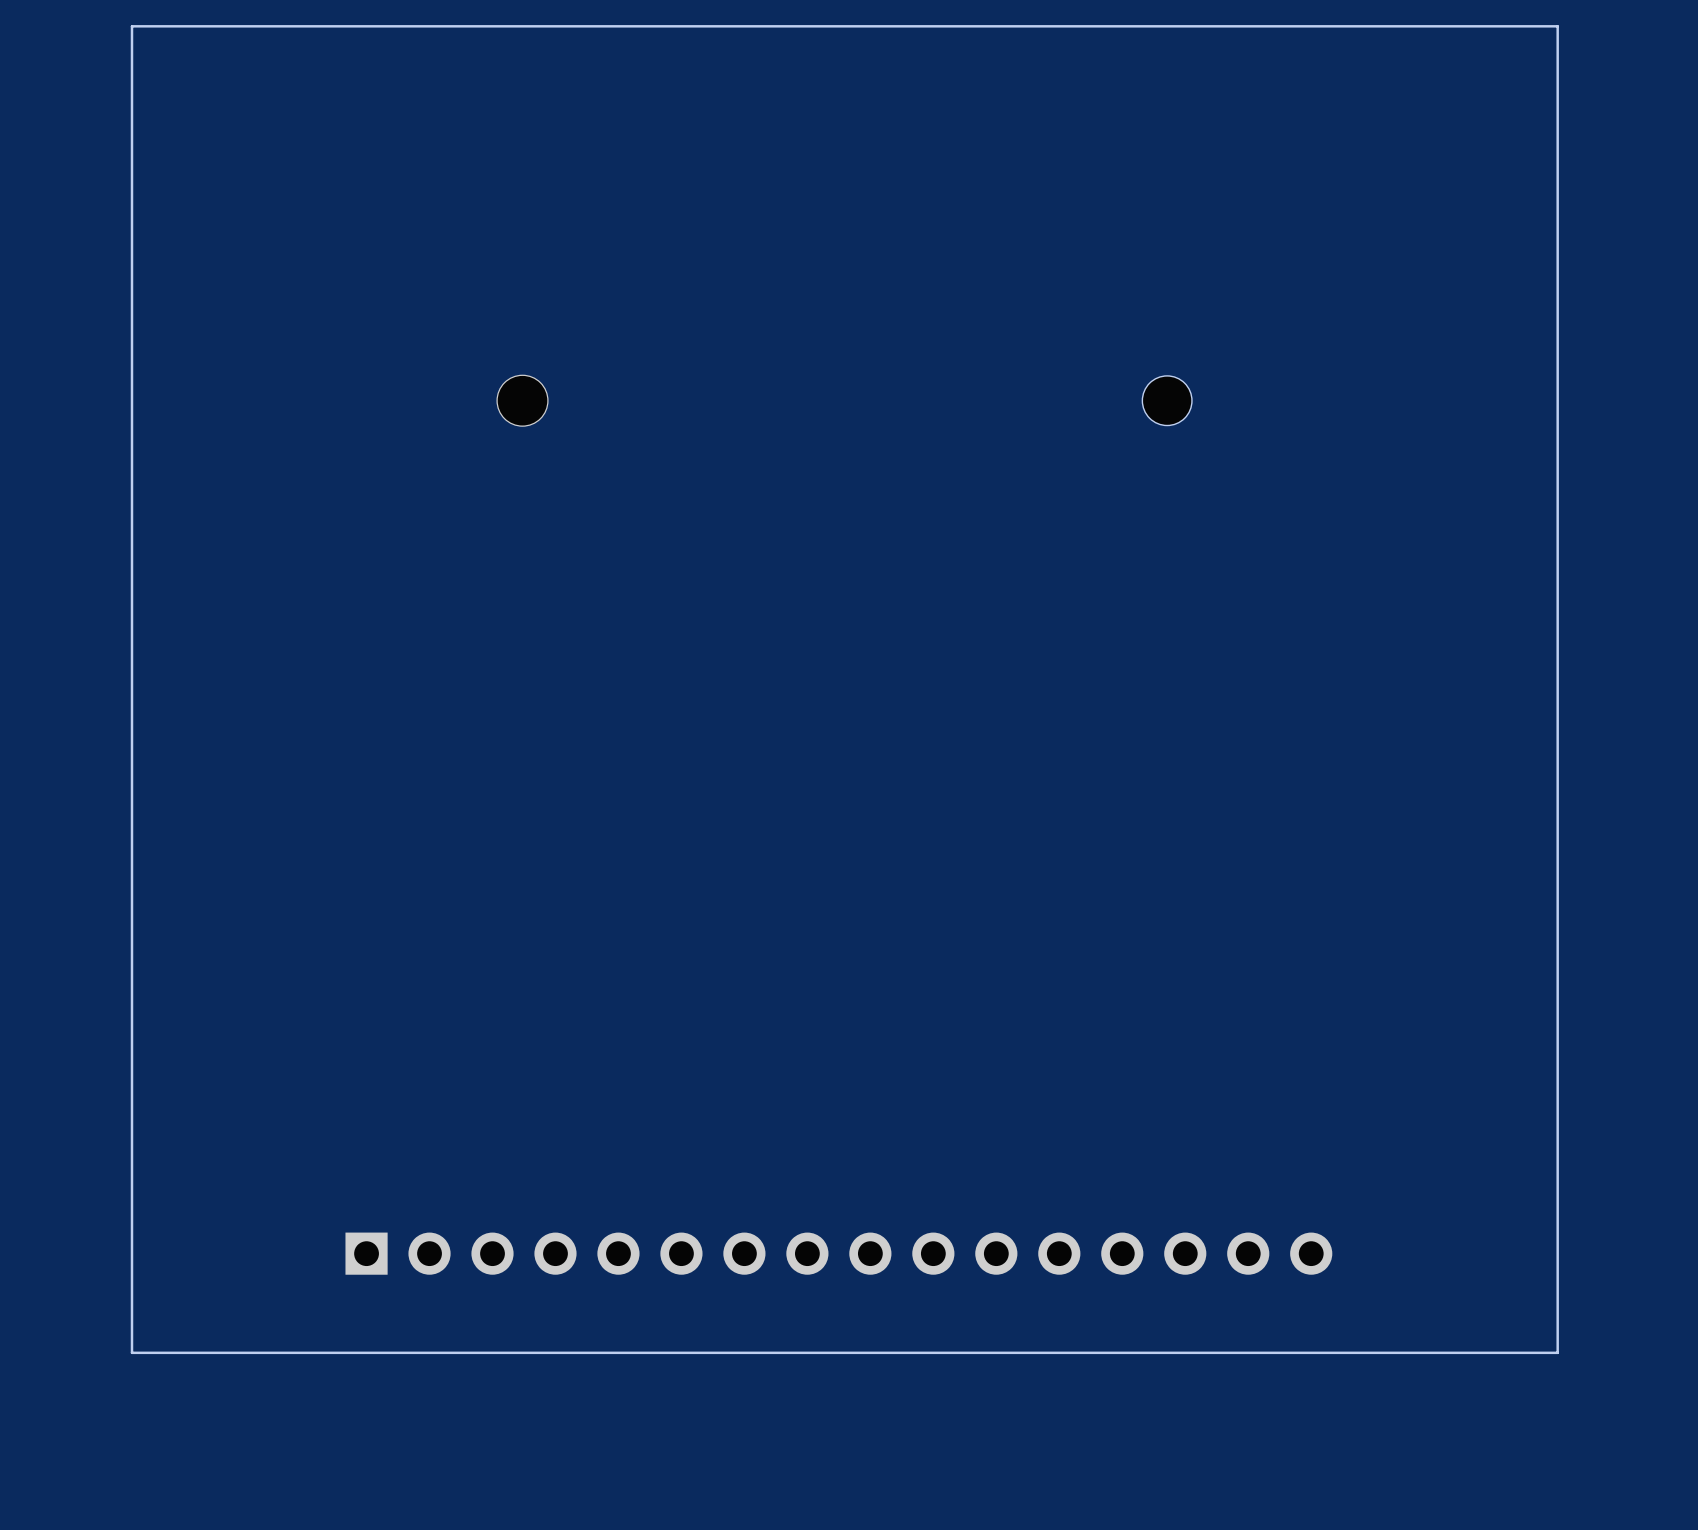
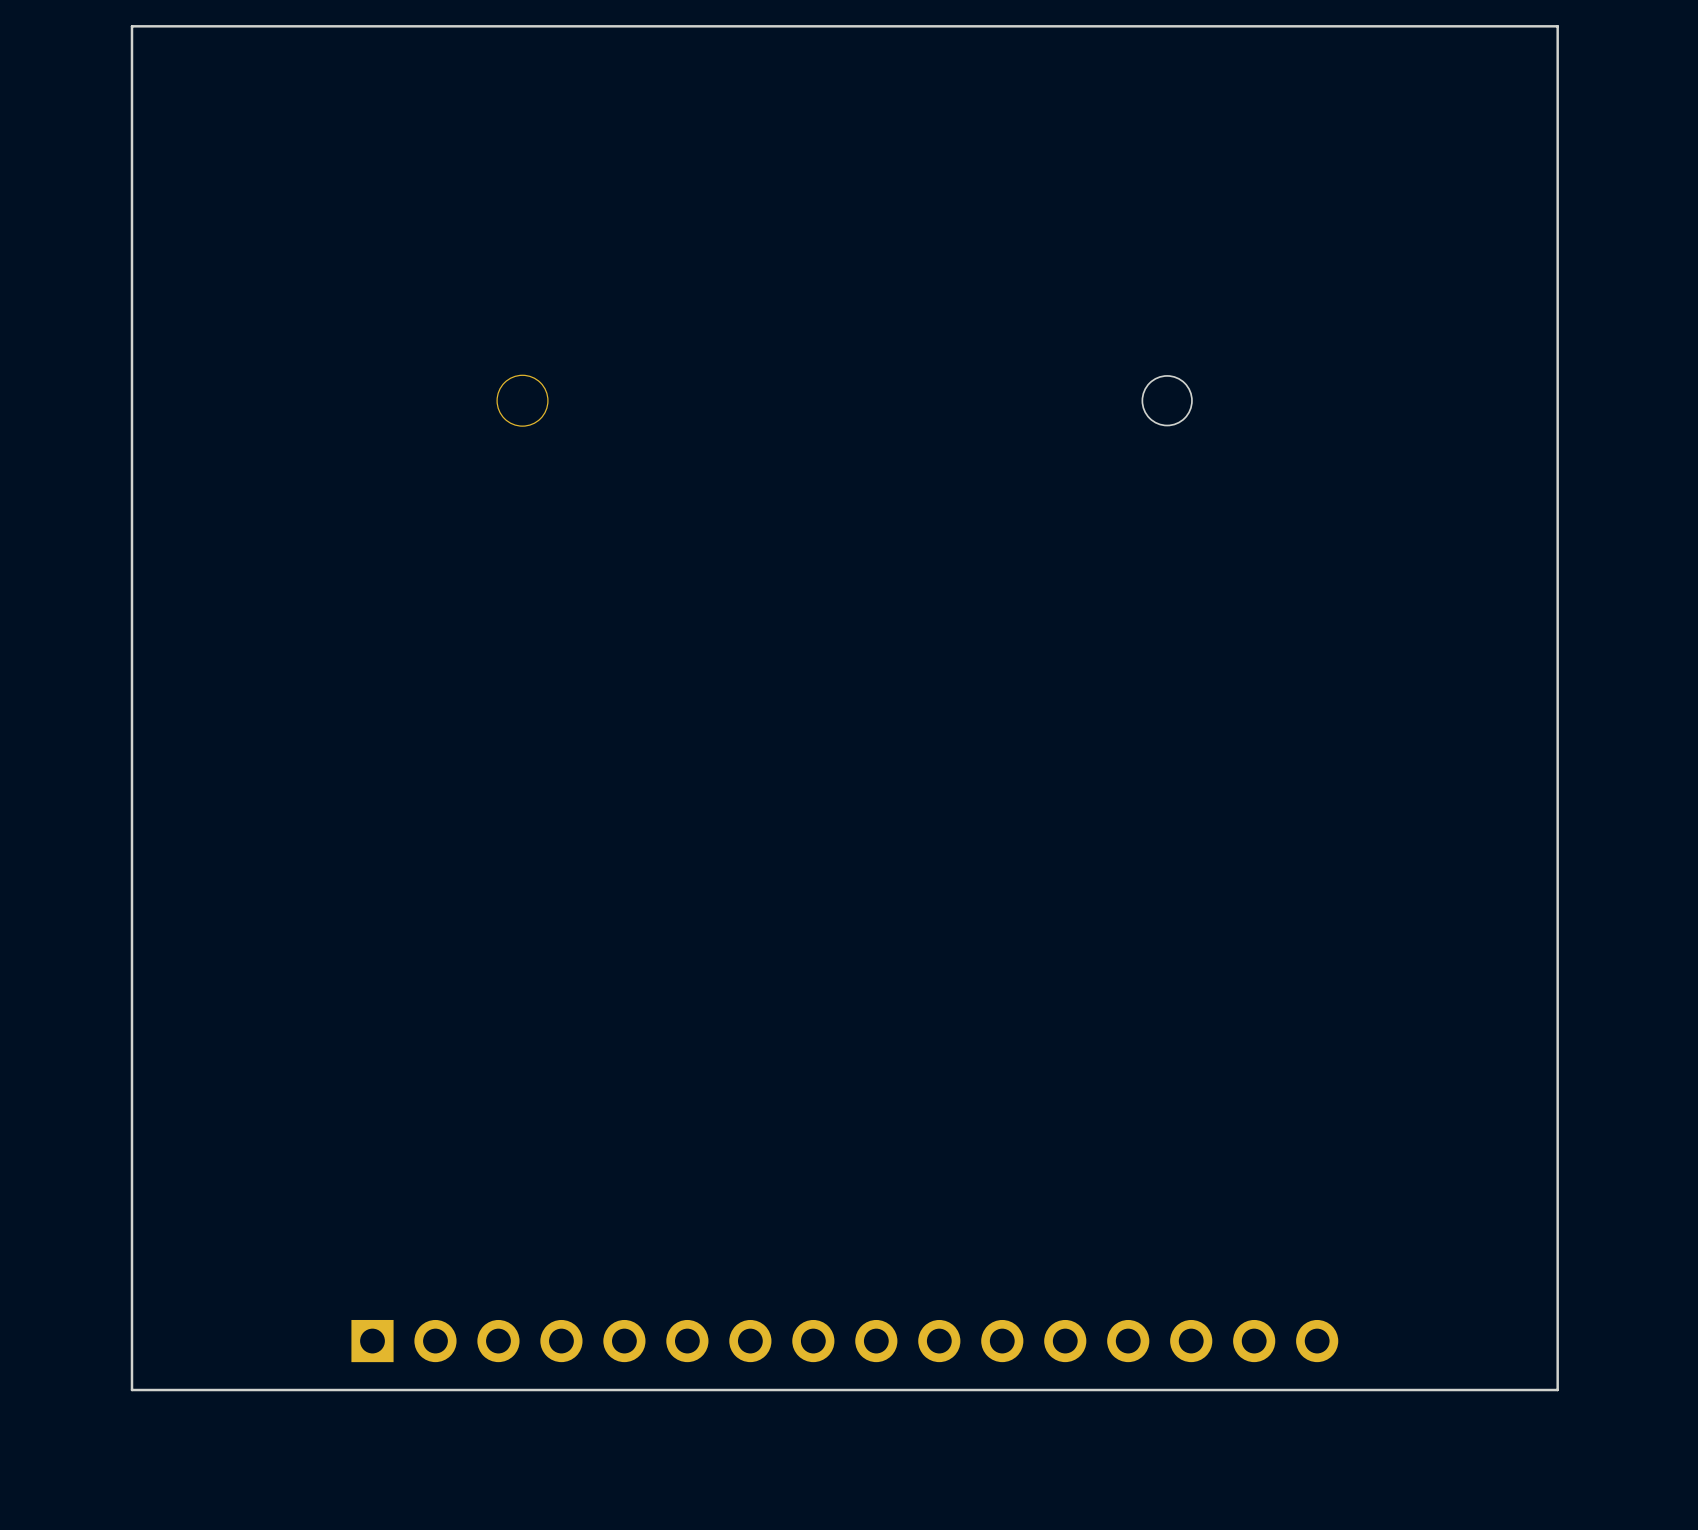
part position: (838, 1253) -> (844, 1341)
board edge: (1557, 1352) (131, 1352) -> (1557, 1352) (1557, 1390) (131, 1390) (131, 1352)

